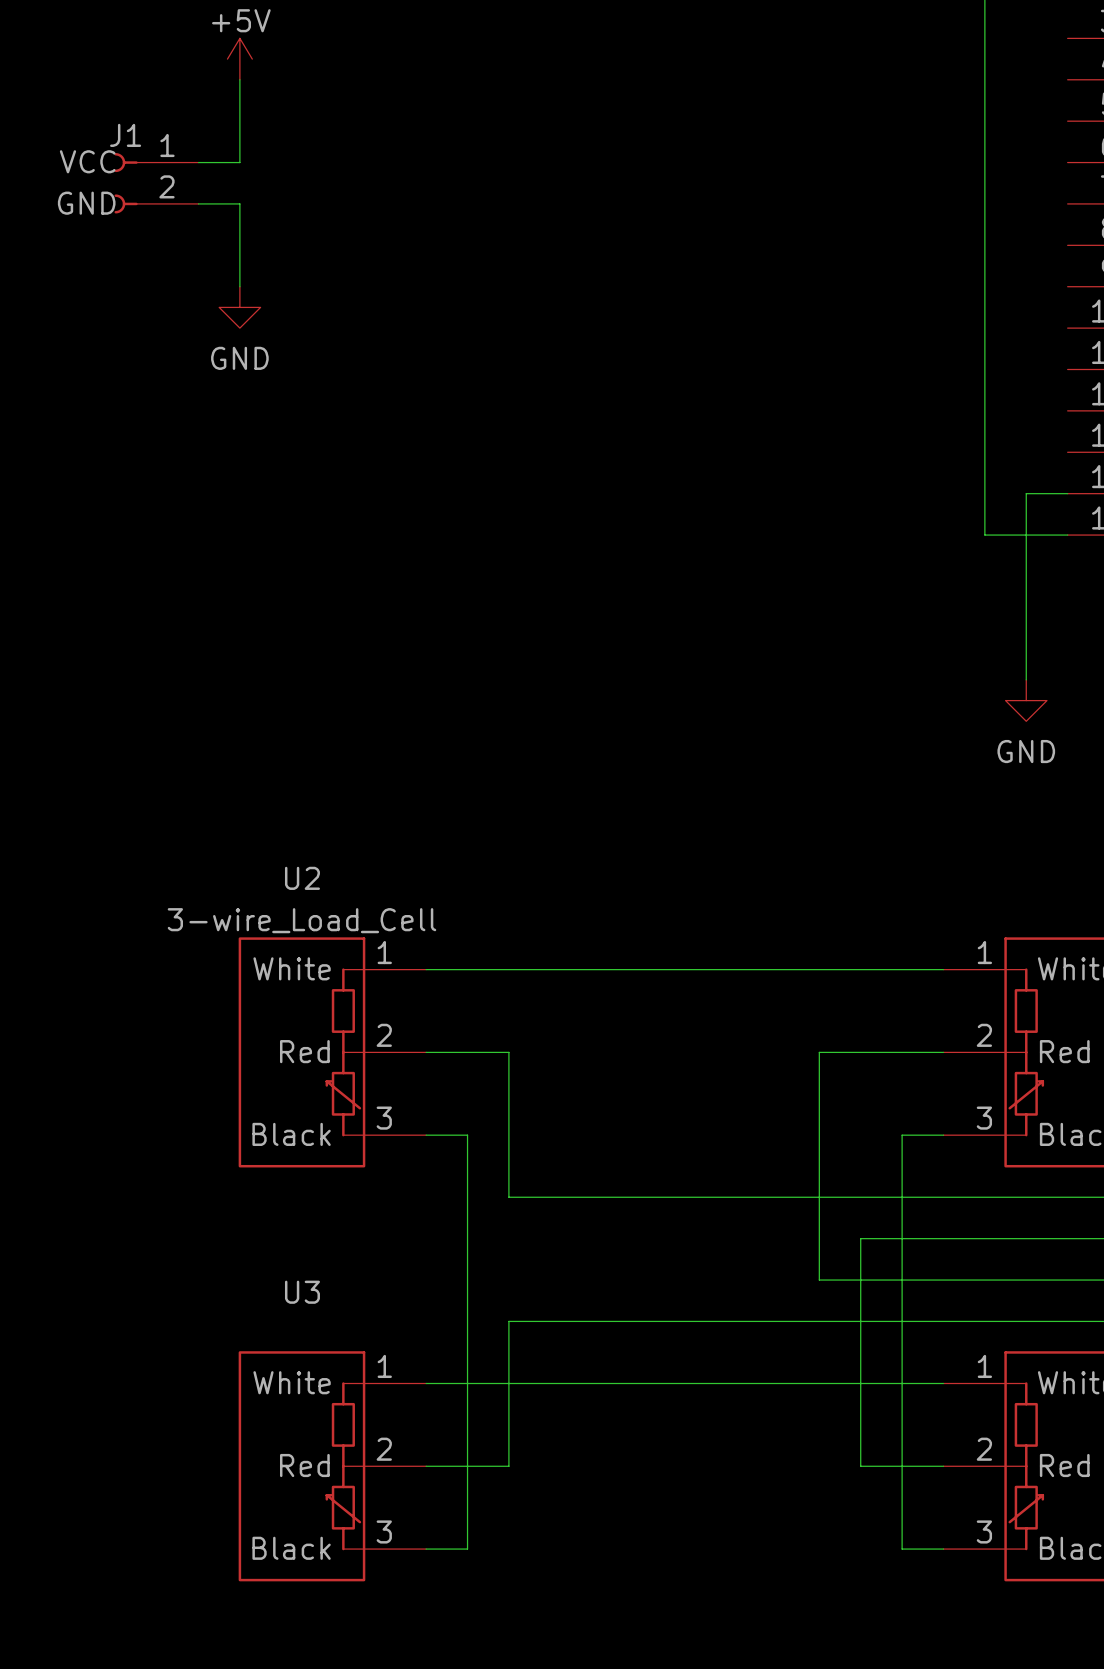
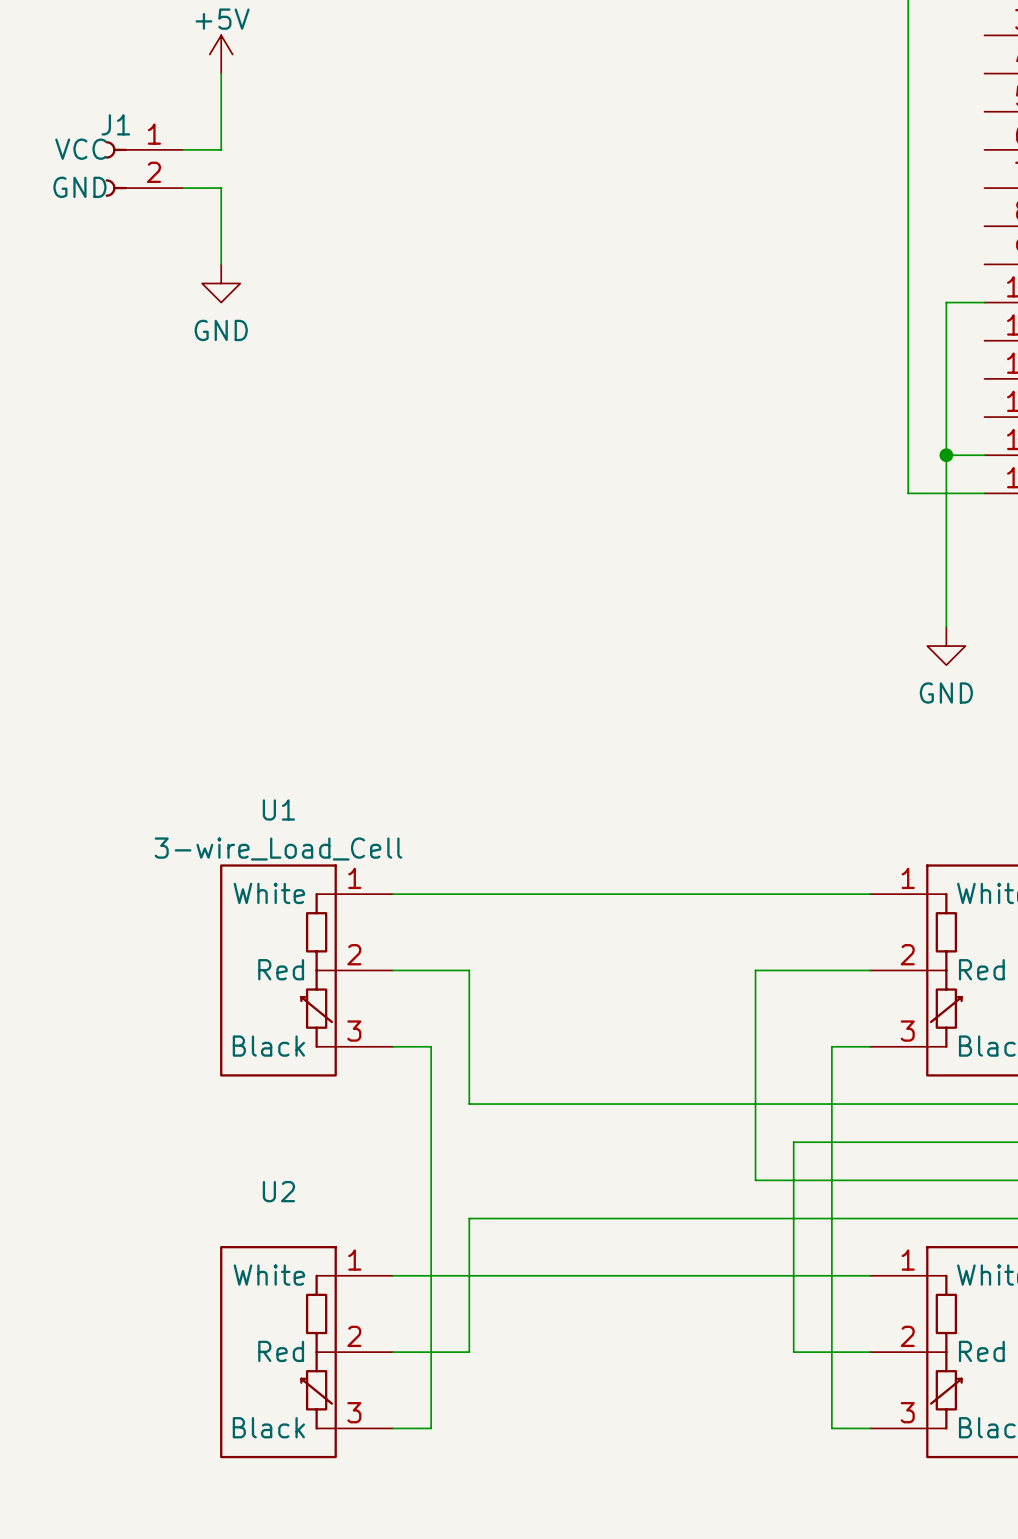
wire: none -> (984, 302) (946, 302) (946, 455)
junction: none -> (946, 455)
U2 name: U2 (302, 878) -> U1 (278, 809)
U3 name: U3 (302, 1292) -> U2 (278, 1191)

